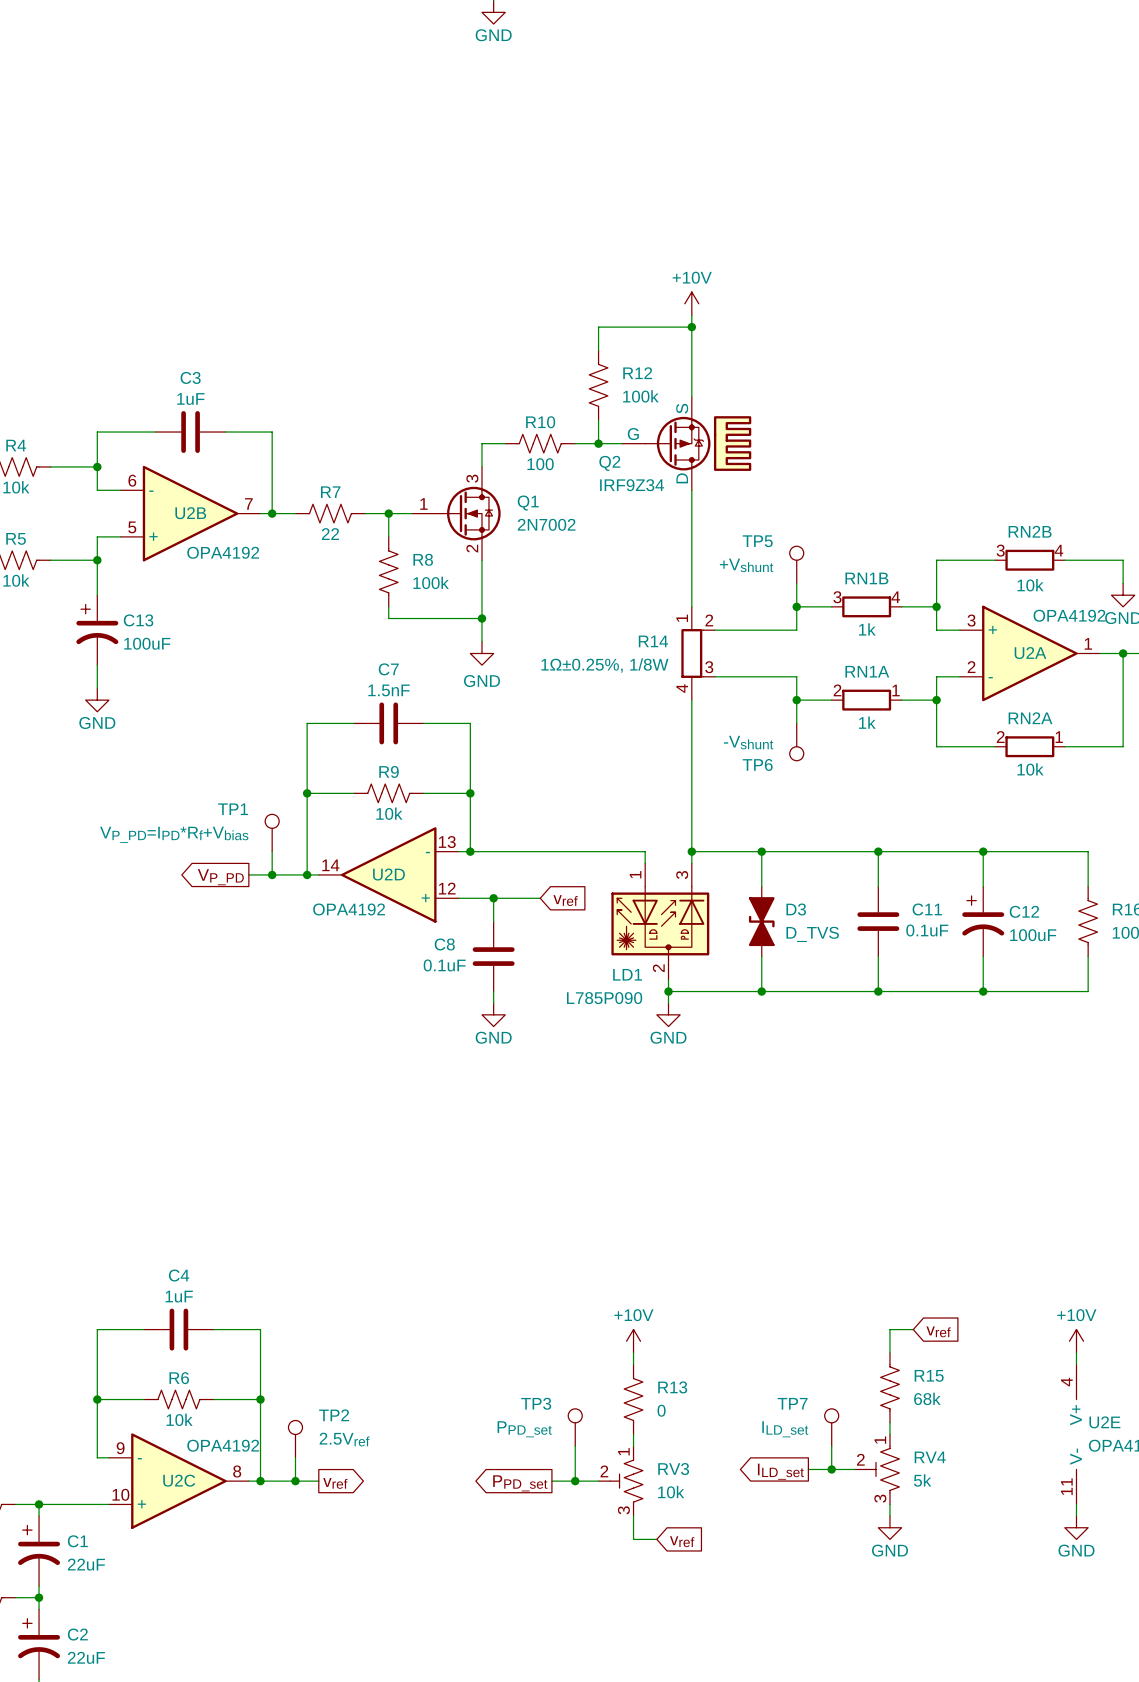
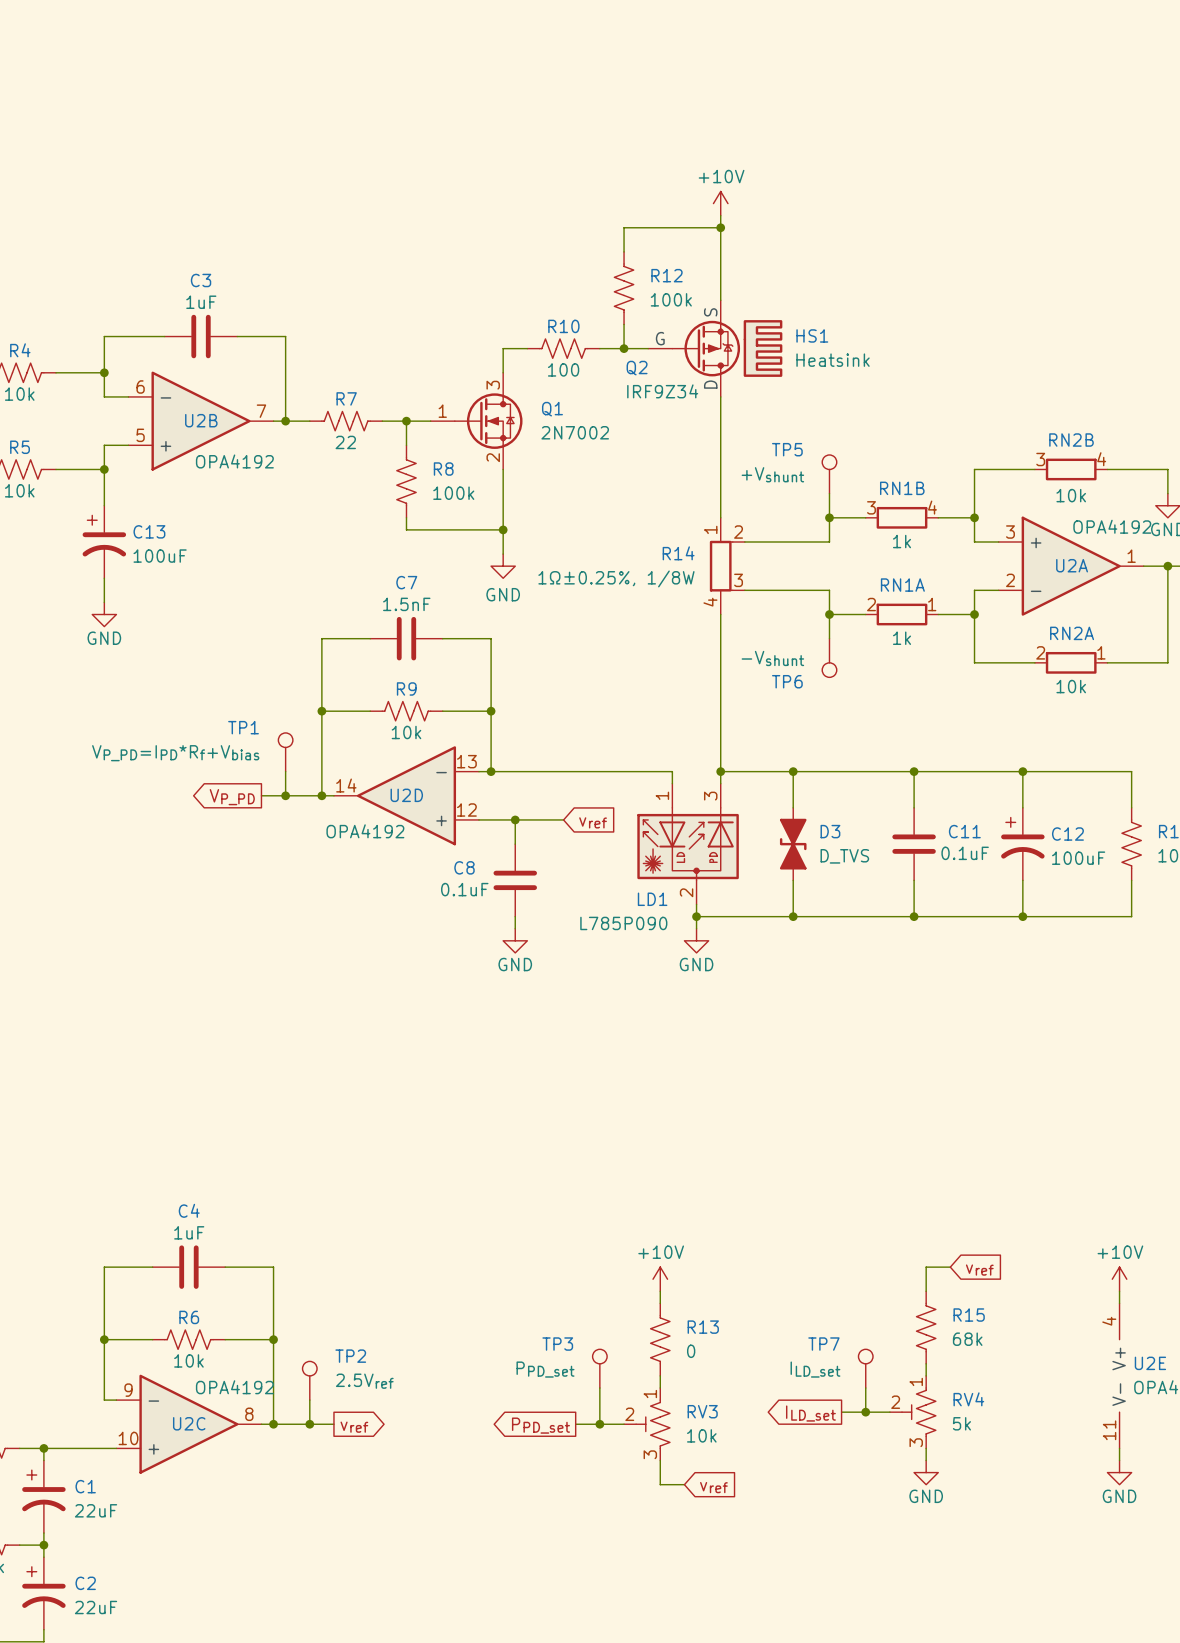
HS1 name: none -> HS1 (812, 335)
HS1 value: none -> Heatsink (833, 360)

